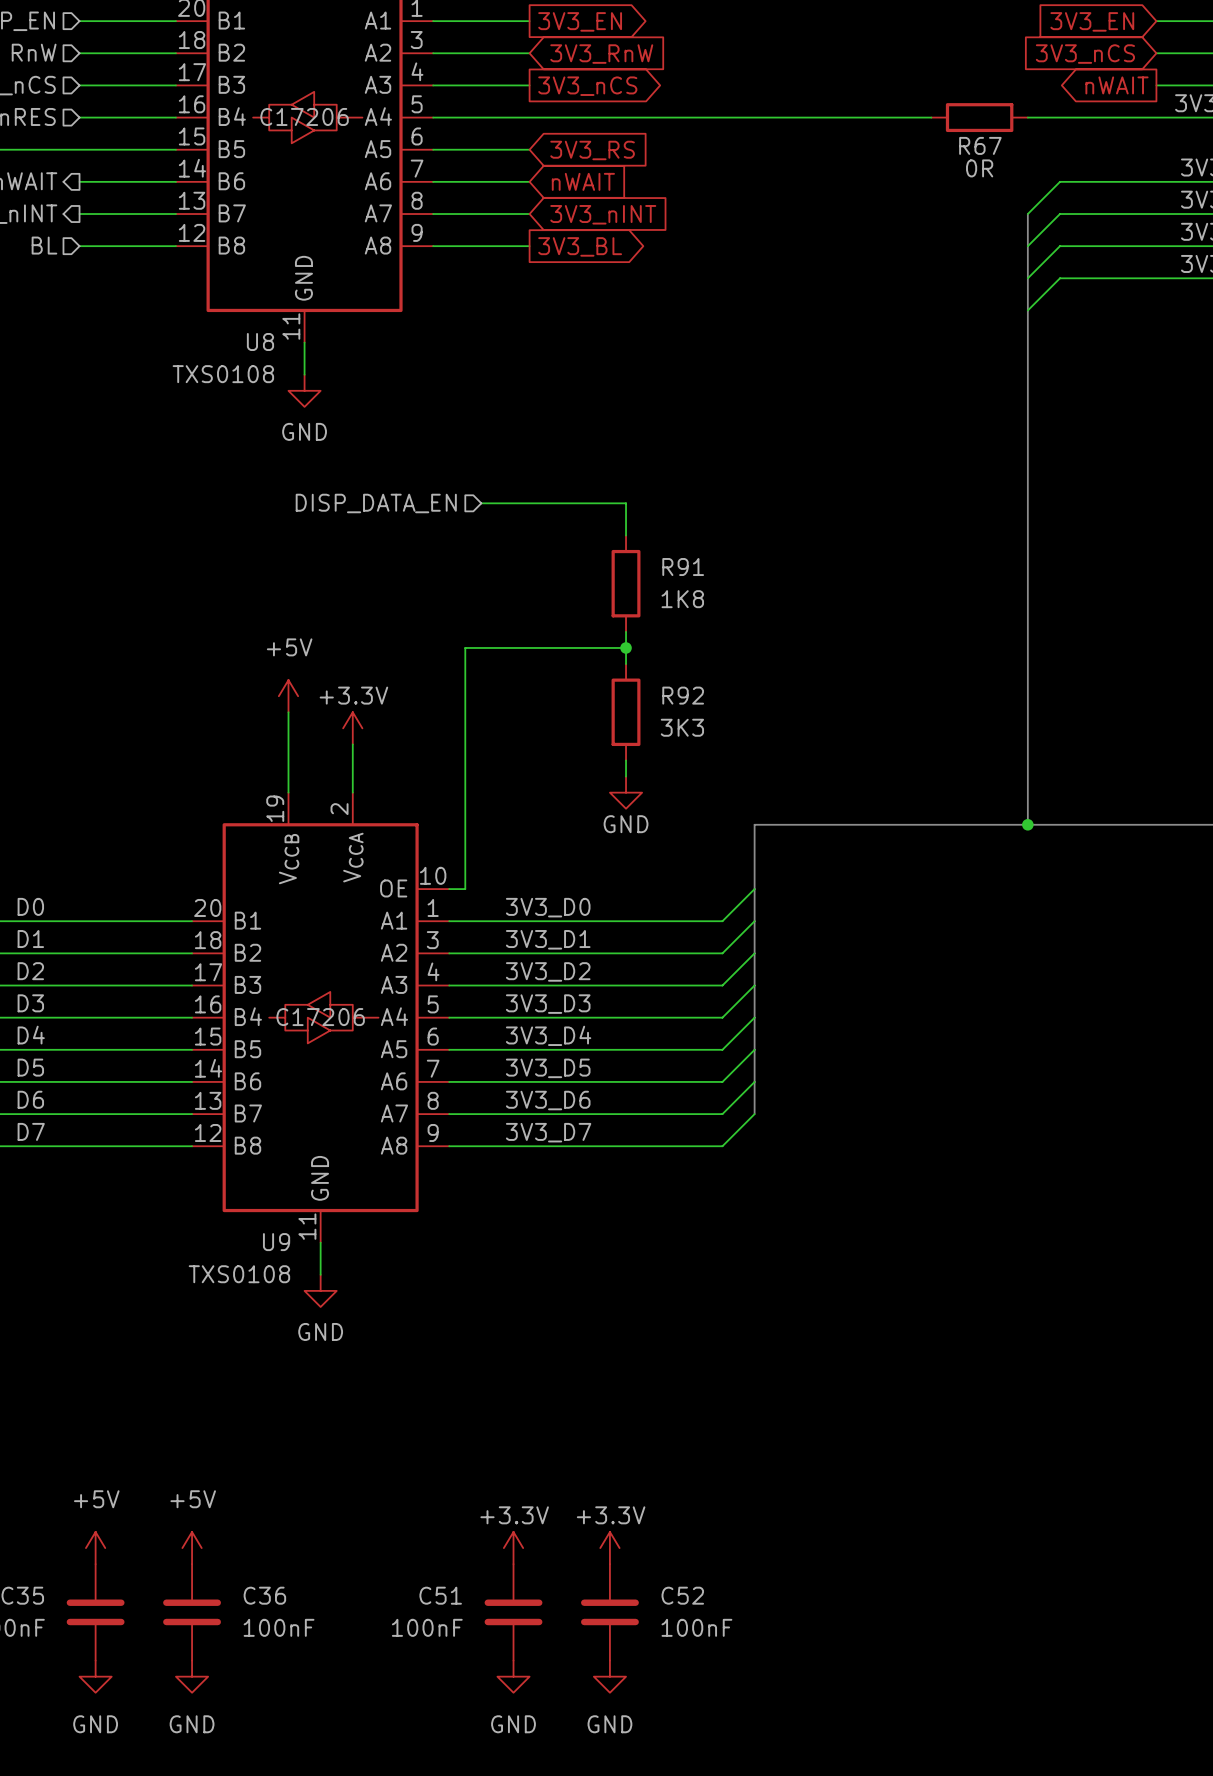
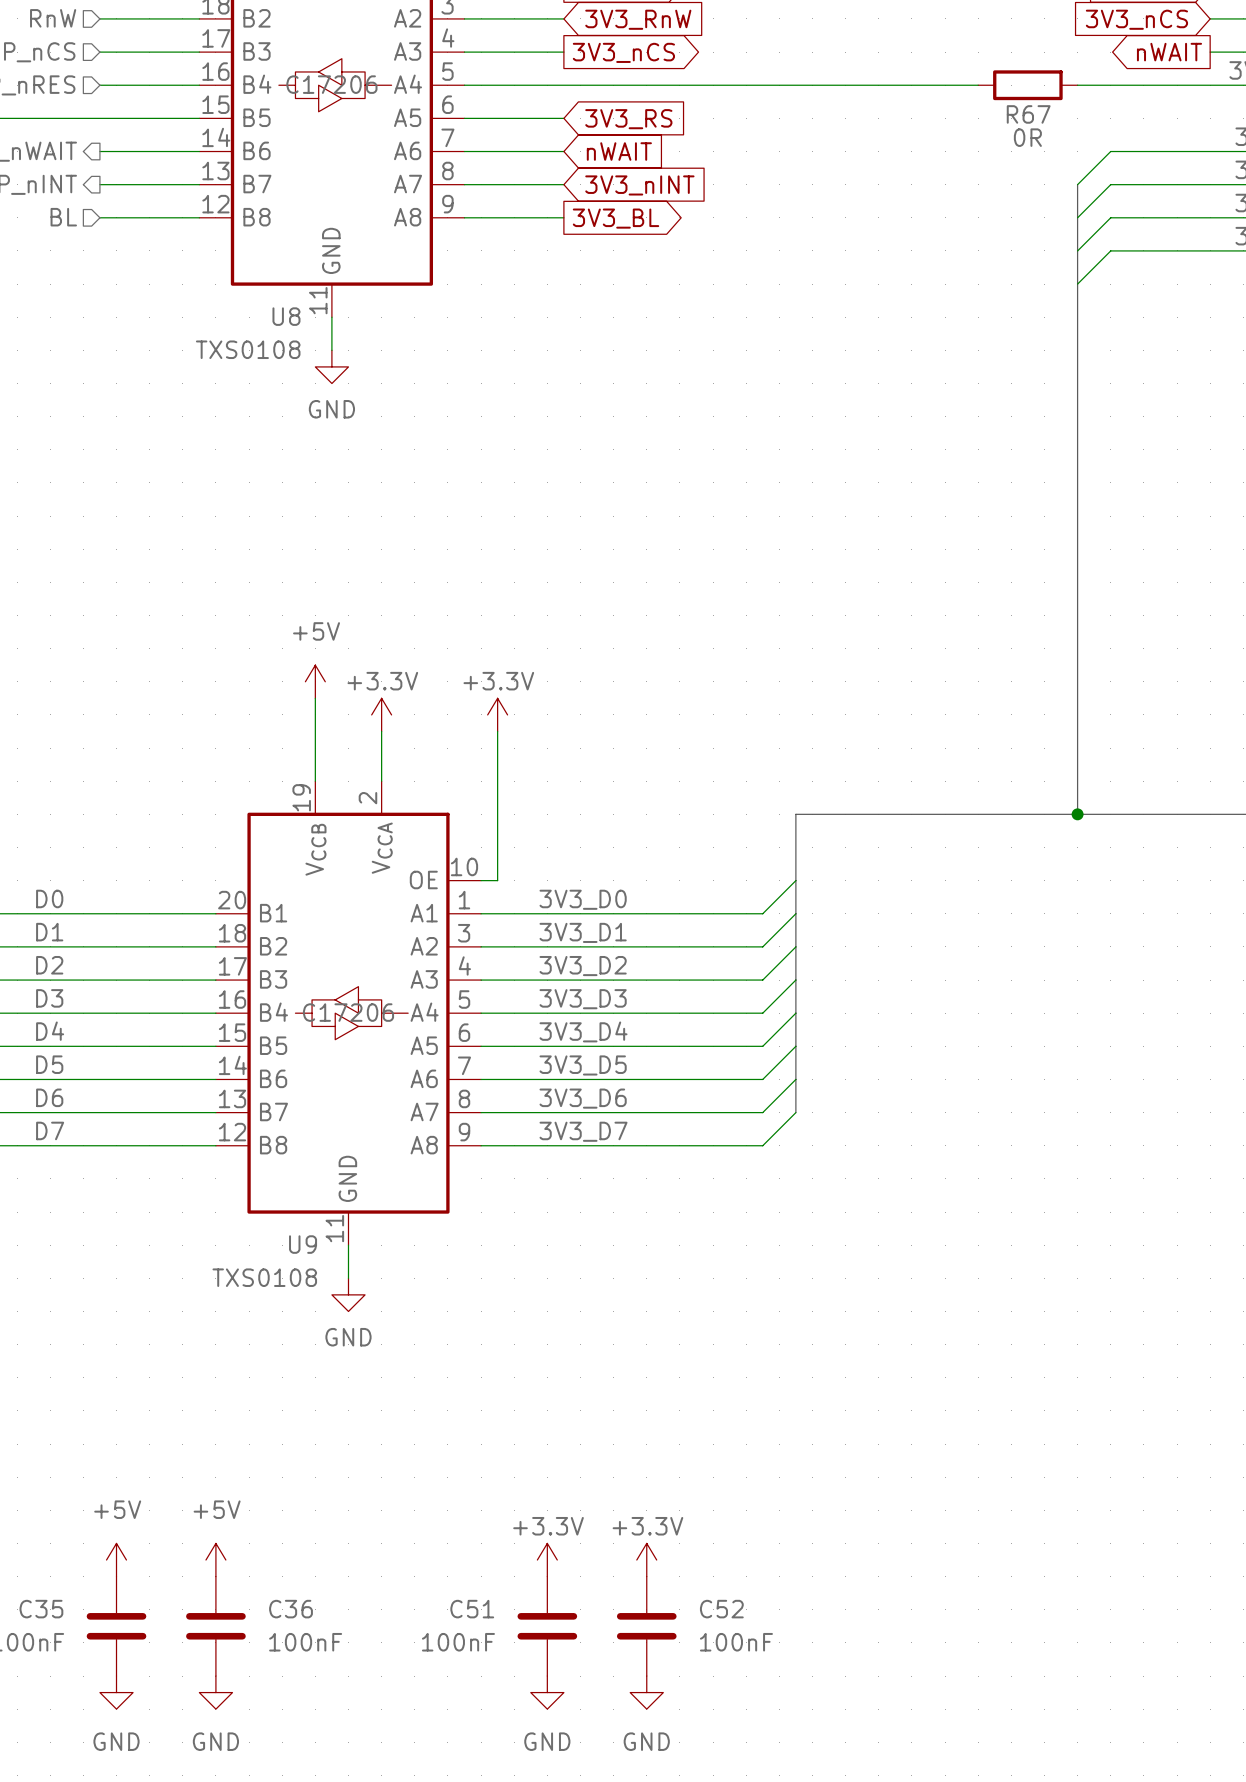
hierarchical label: DISP_DATA_EN (376, 503) -> none
wire: (481, 503) (626, 503) (626, 535) -> none
R91: 1K8 (626, 583) -> none
wire: (626, 631) (626, 664) -> none
wire: (626, 647) (465, 647) (465, 744) -> none
junction: (626, 647) -> none
R92: 3K3 (626, 712) -> none
power symbol: none -> +3.3V (497, 714)
wire: (626, 760) (626, 776) -> none
power symbol: GND (626, 792) -> none

